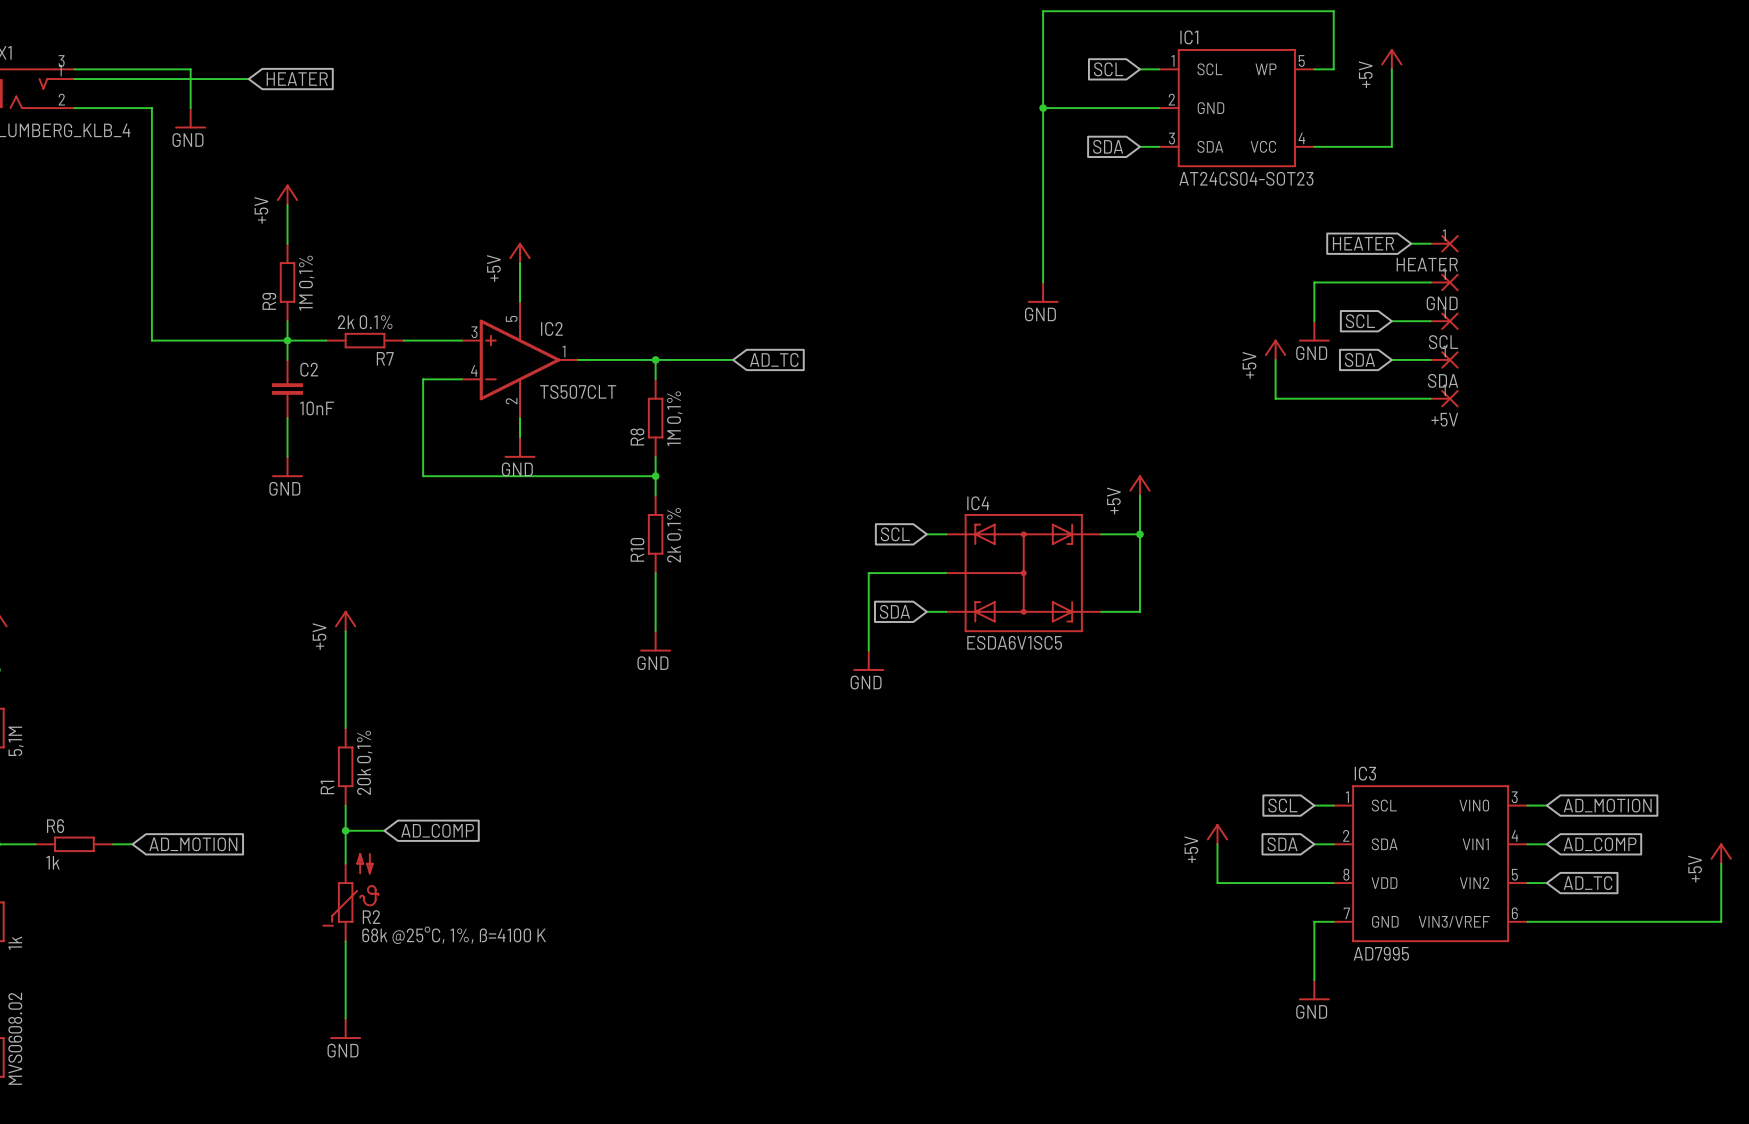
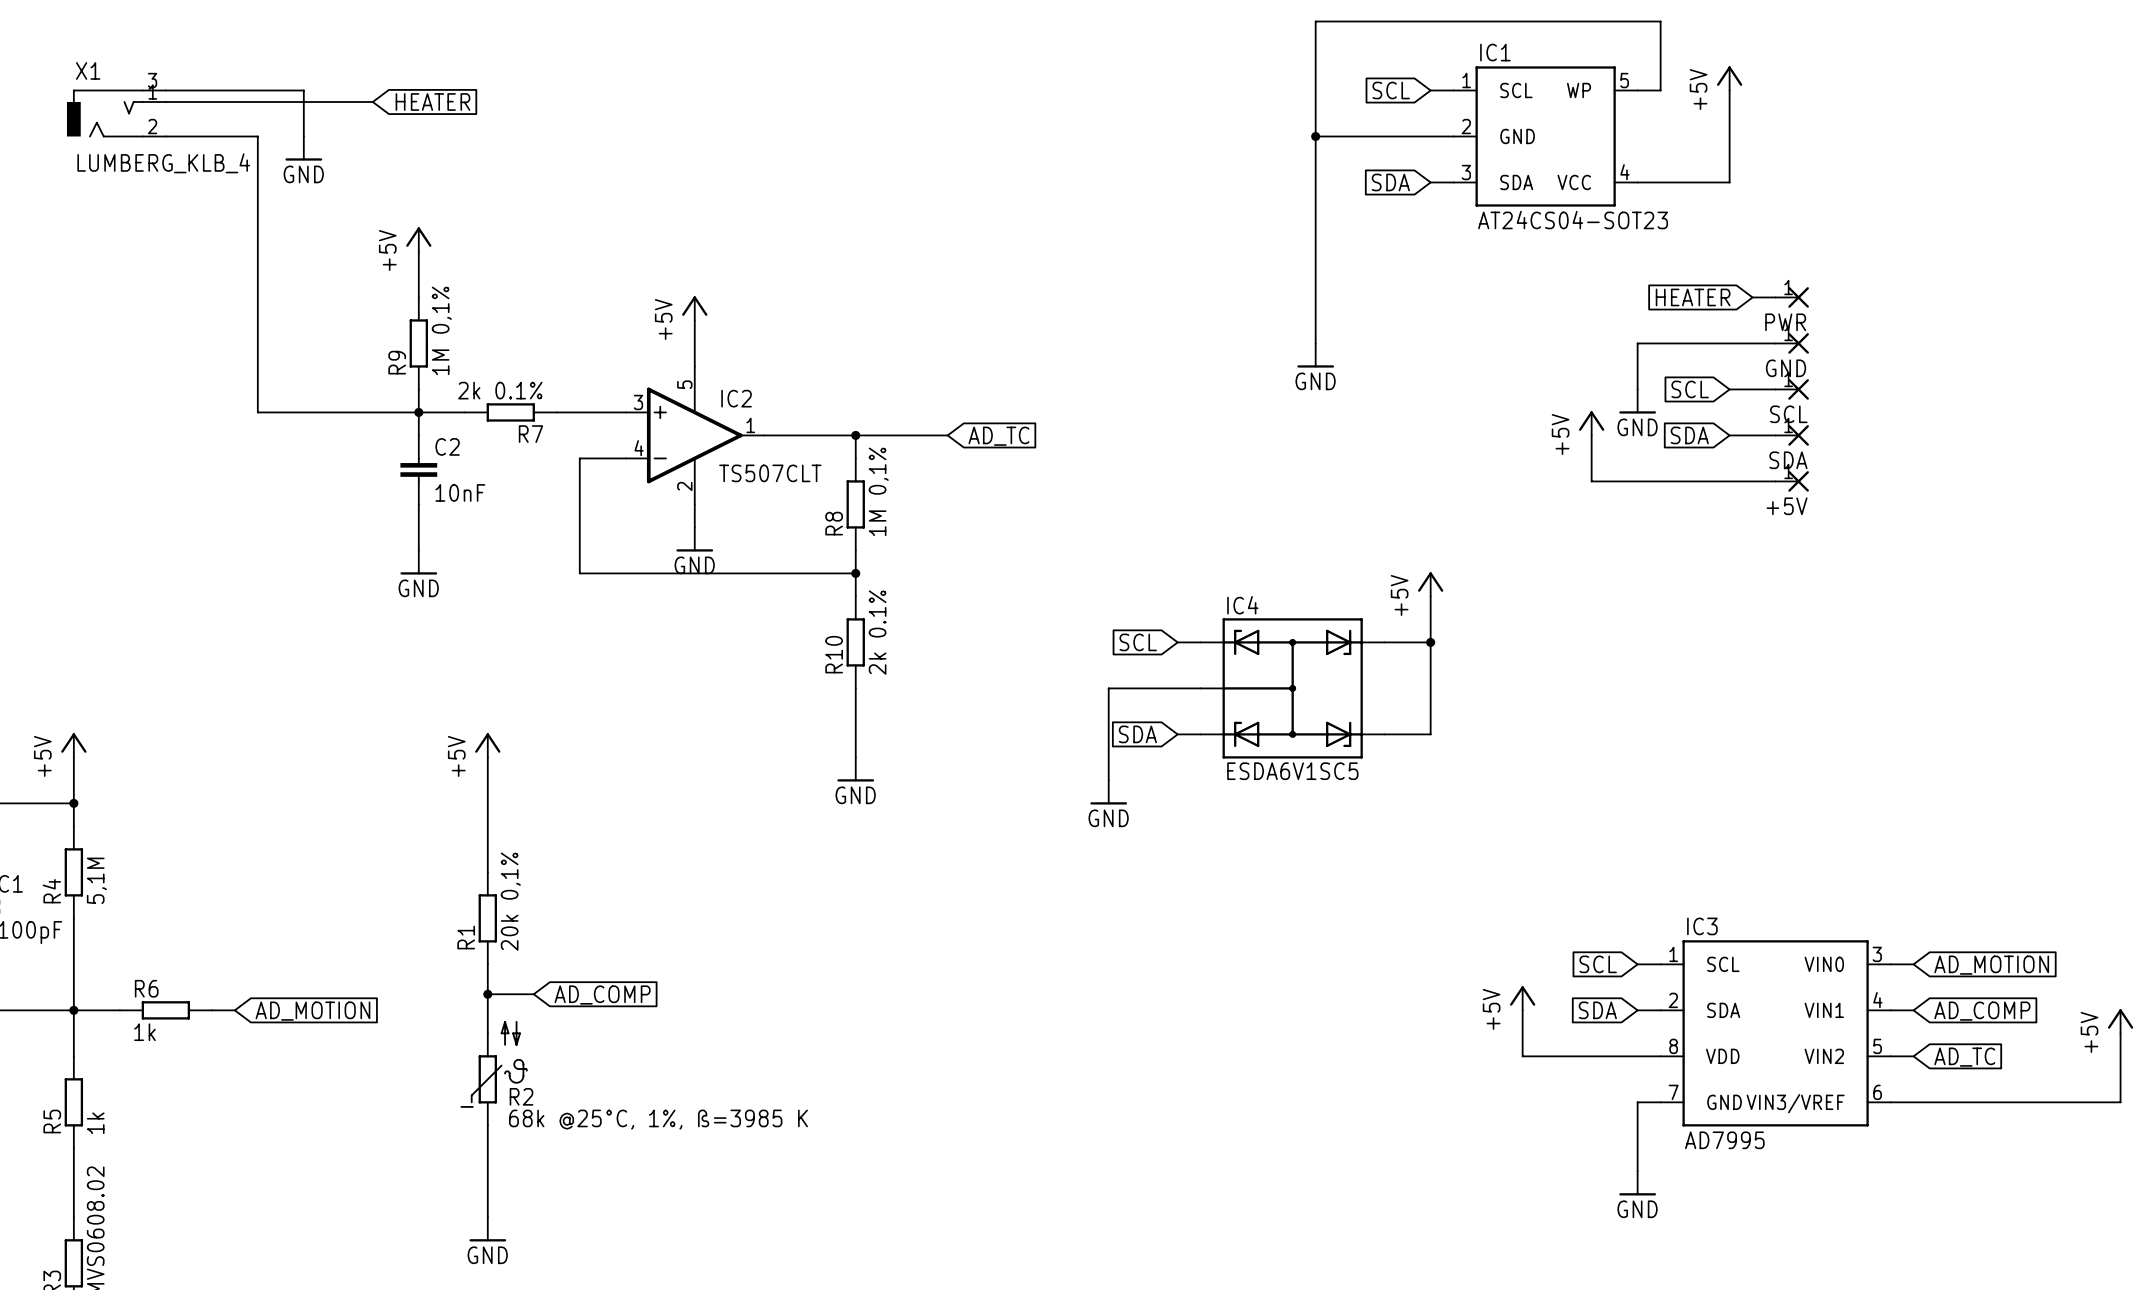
HEATER name: HEATER (1427, 264) -> PWR (1785, 322)
R10 value: 2k 0,1% (674, 535) -> 2k 0.1% (877, 632)
R2 value: 68k @25°C, 1%, ß=4100 K (454, 935) -> 68k @25°C, 1%, ß=3985 K (658, 1119)

